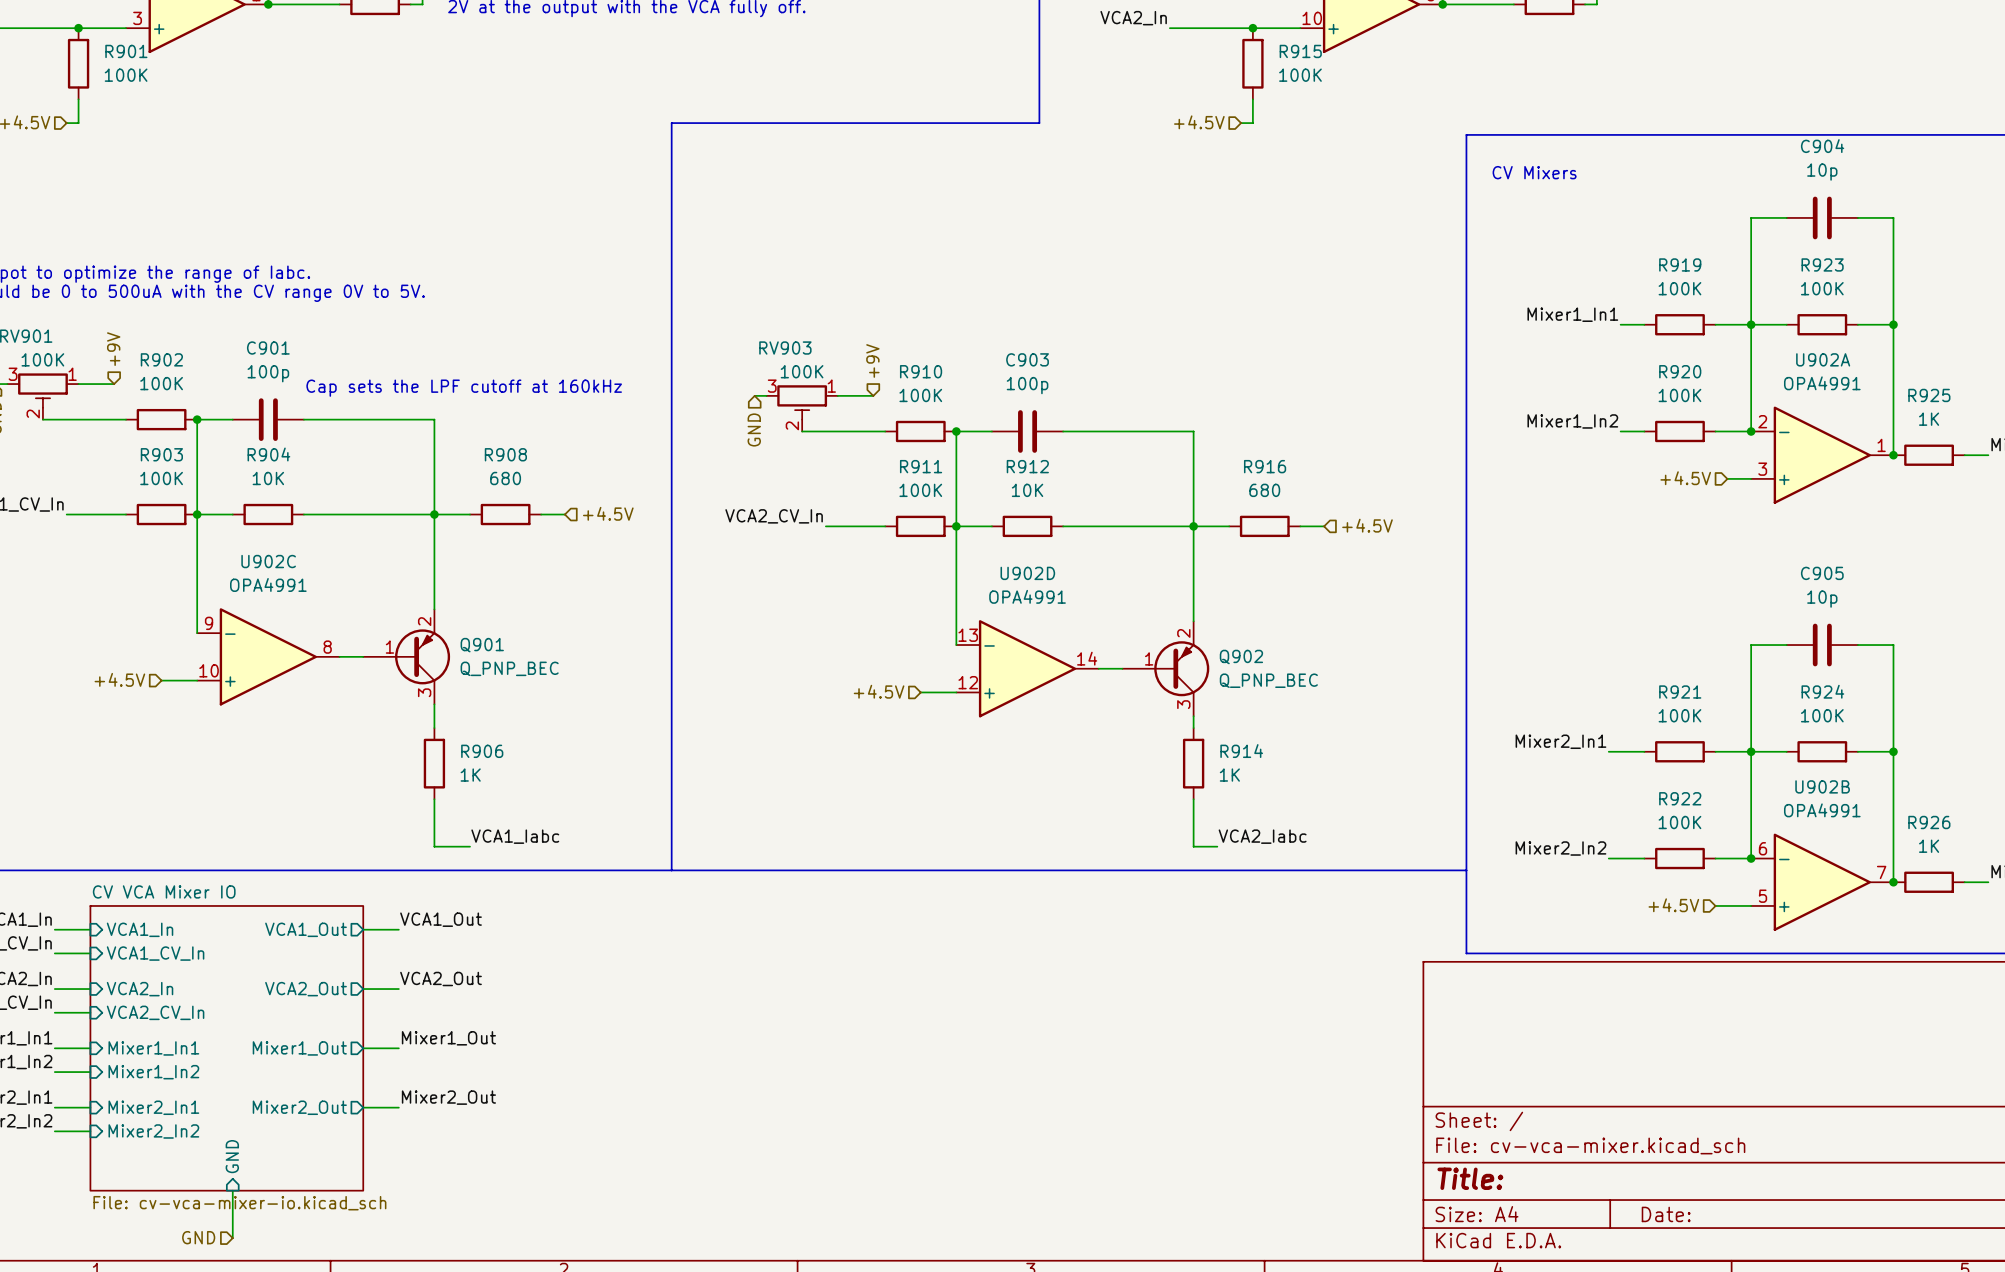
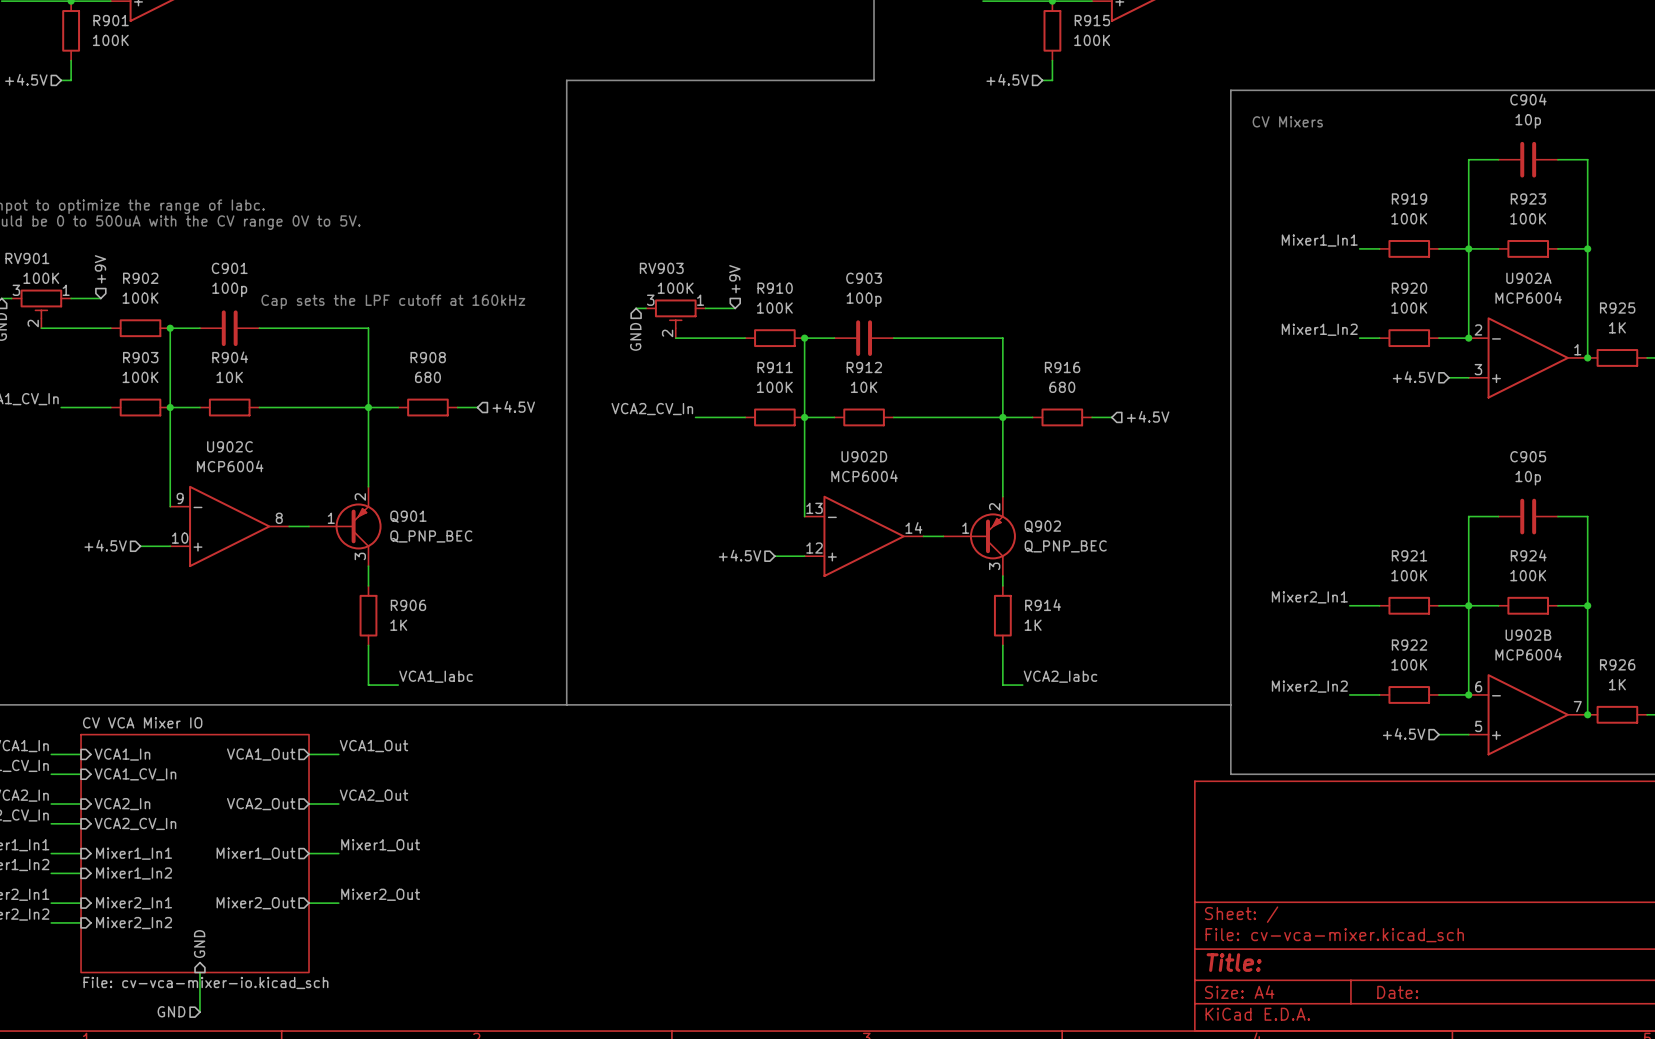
U902A value: OPA4991 (1822, 383) -> MCP6004 (1528, 297)
U902C value: OPA4991 (268, 584) -> MCP6004 (230, 466)
U902D value: OPA4991 (1027, 596) -> MCP6004 (864, 476)
U902B value: OPA4991 (1822, 810) -> MCP6004 (1528, 654)

